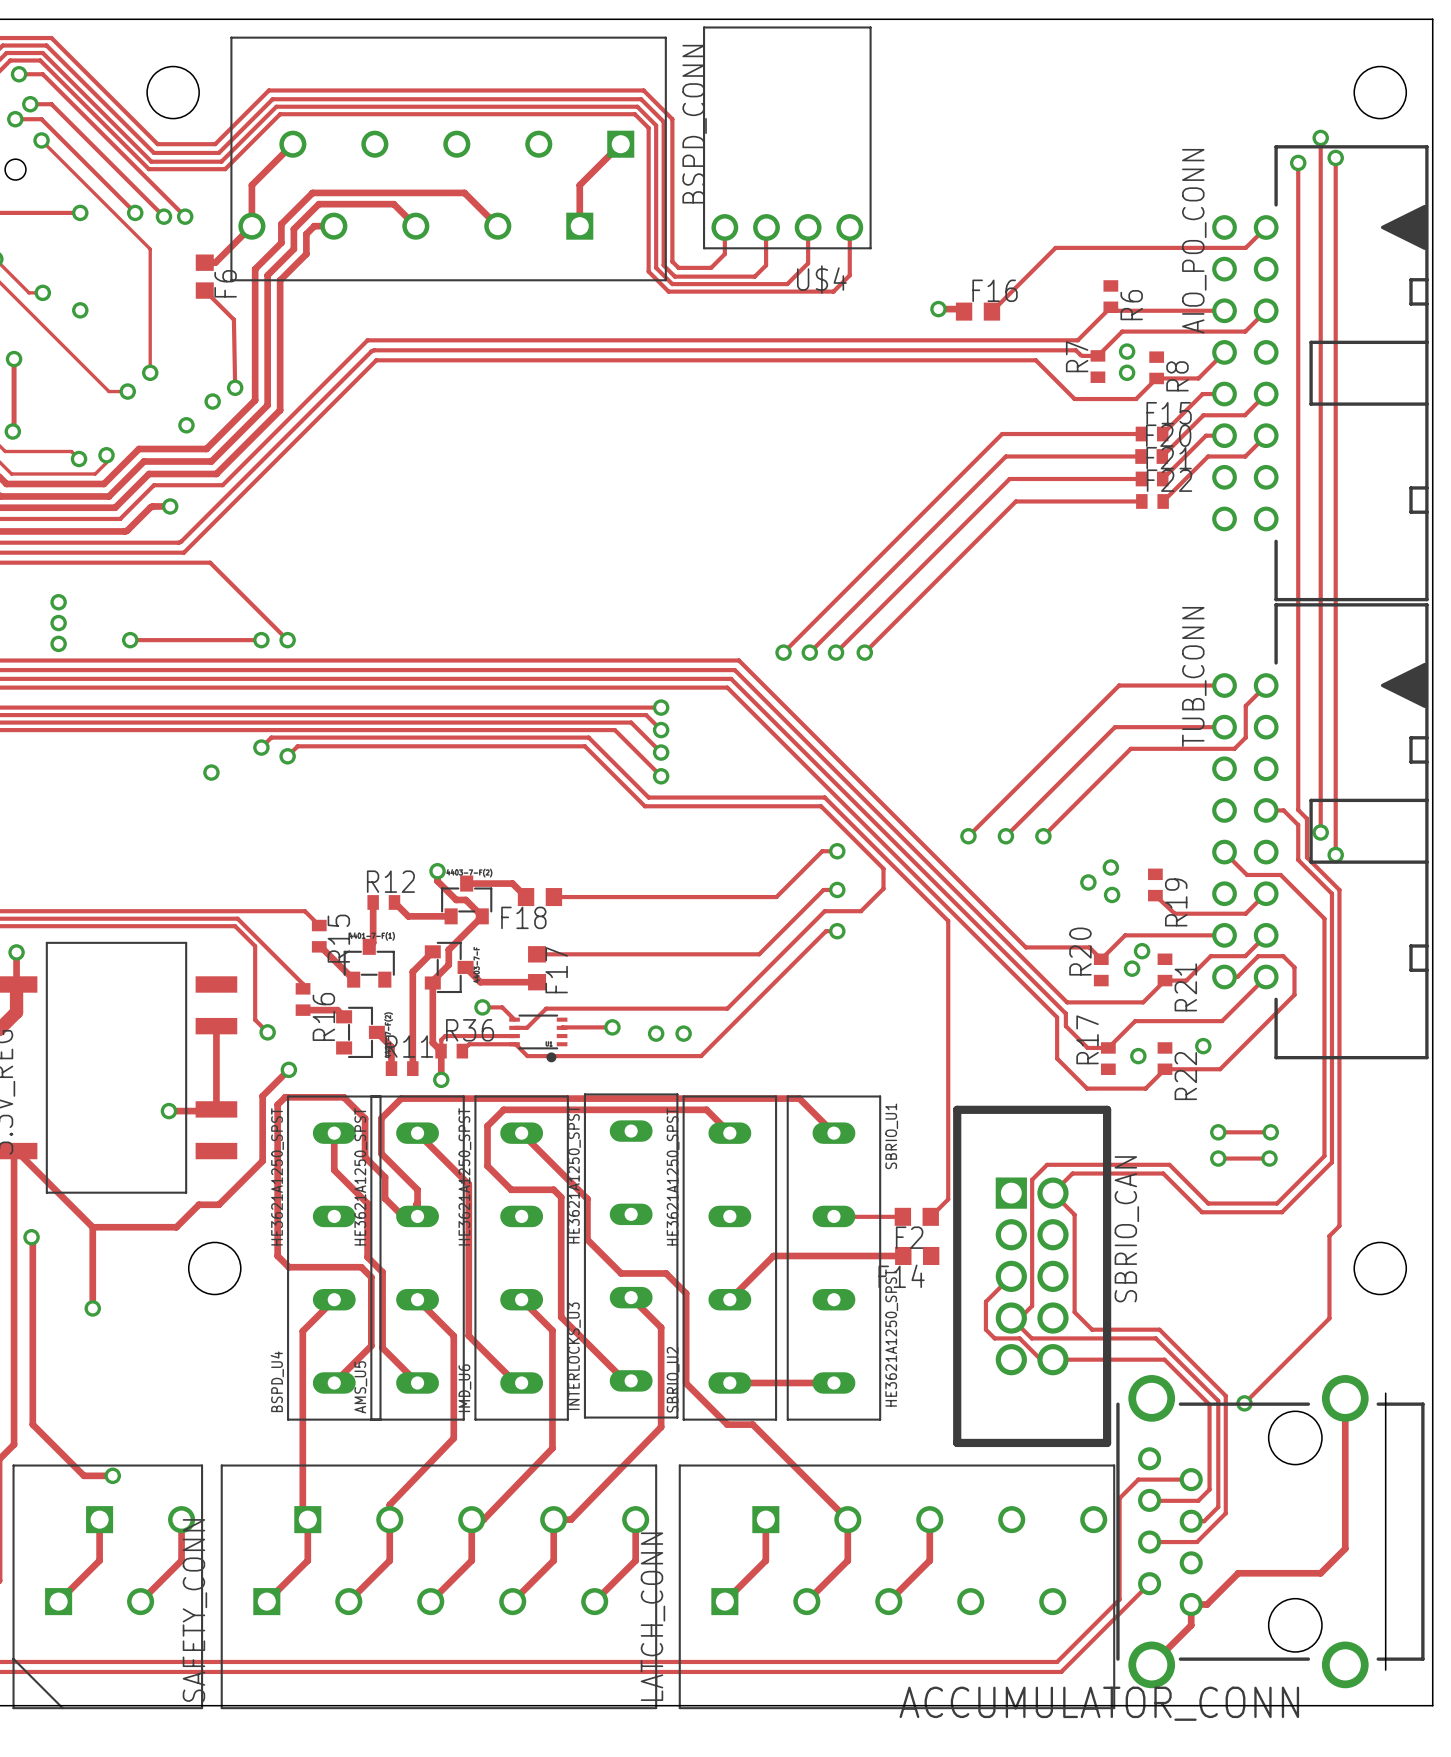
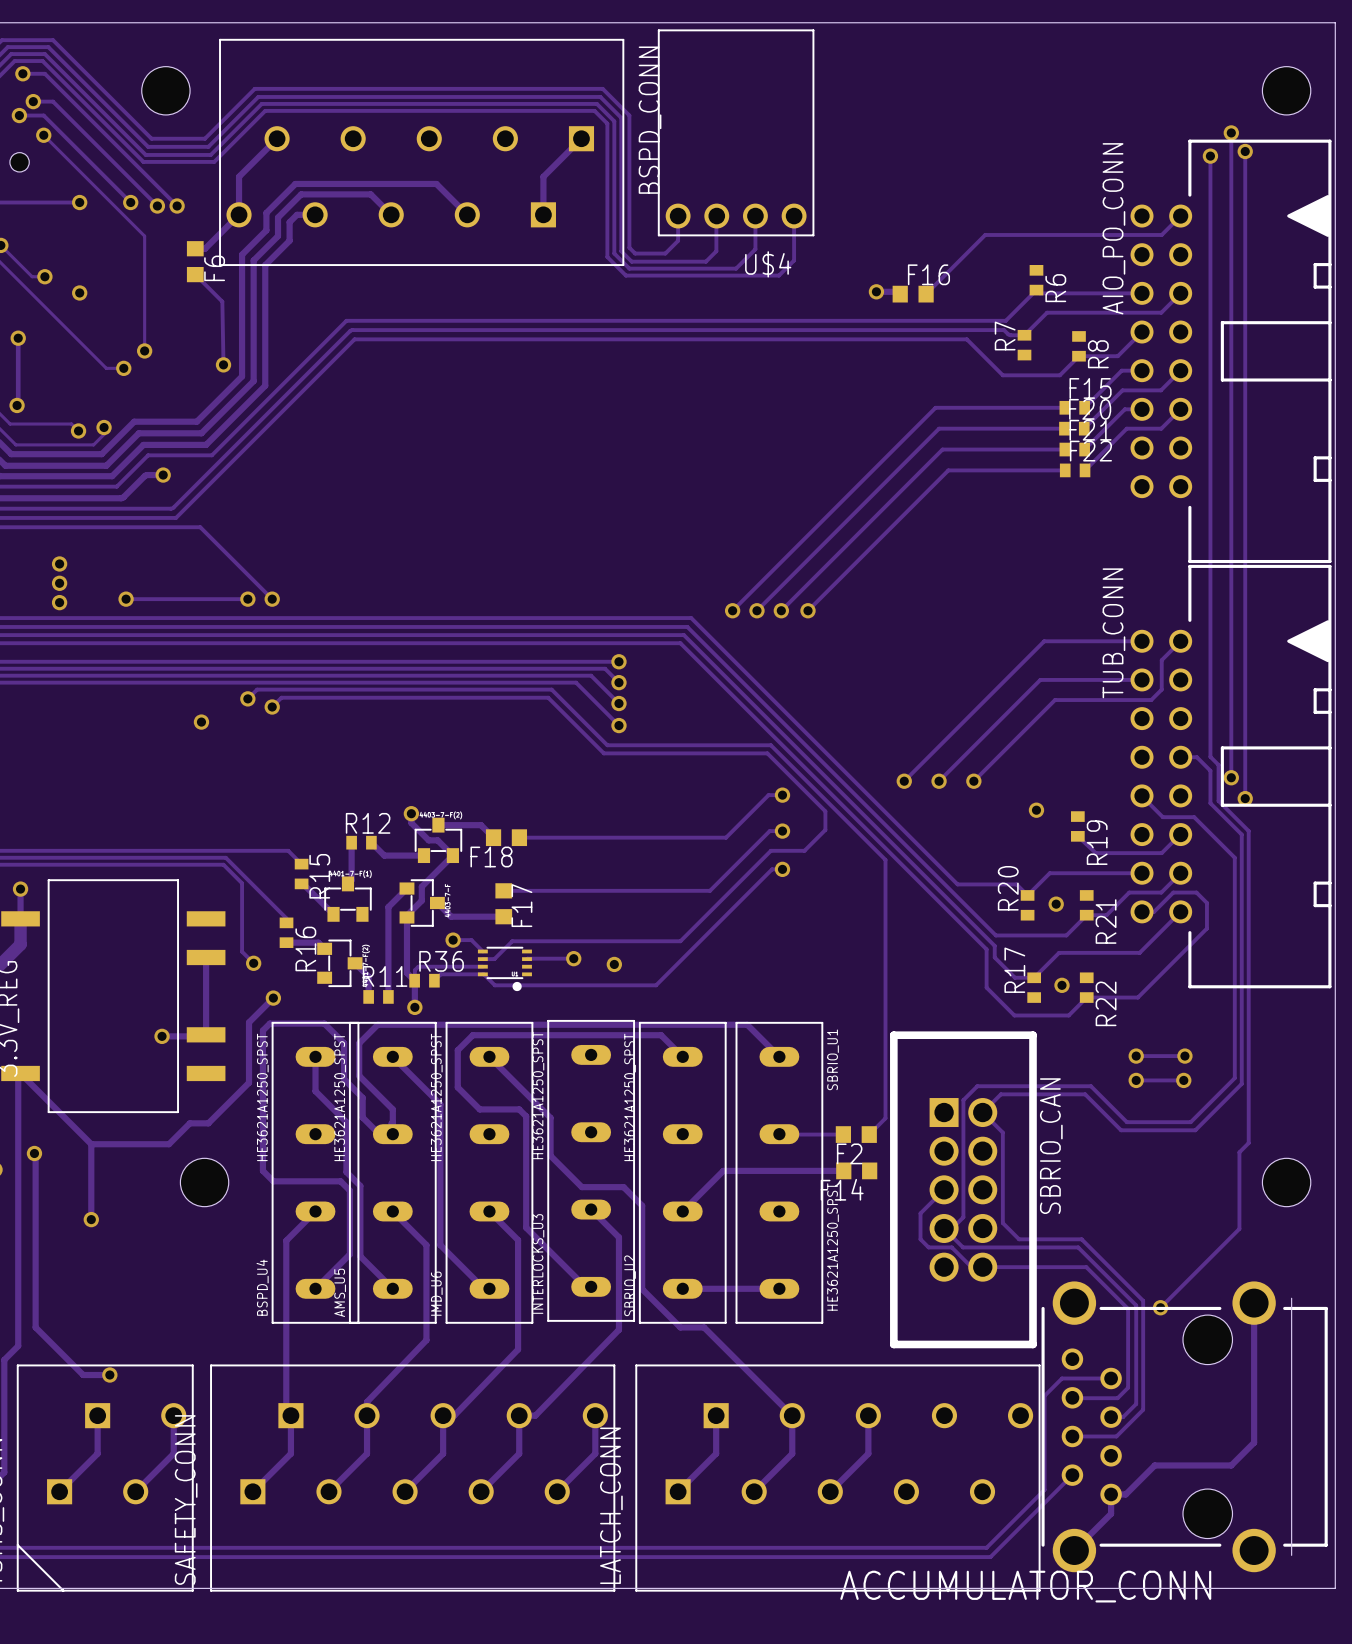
via: (1127, 351) -> none
via: (1127, 372) -> none
via: (212, 401) -> none
via: (186, 425) -> none
via: (1088, 882) -> none
via: (1112, 894) -> none
via: (1142, 951) -> none
via: (683, 1033) -> none
via: (1203, 1046) -> none

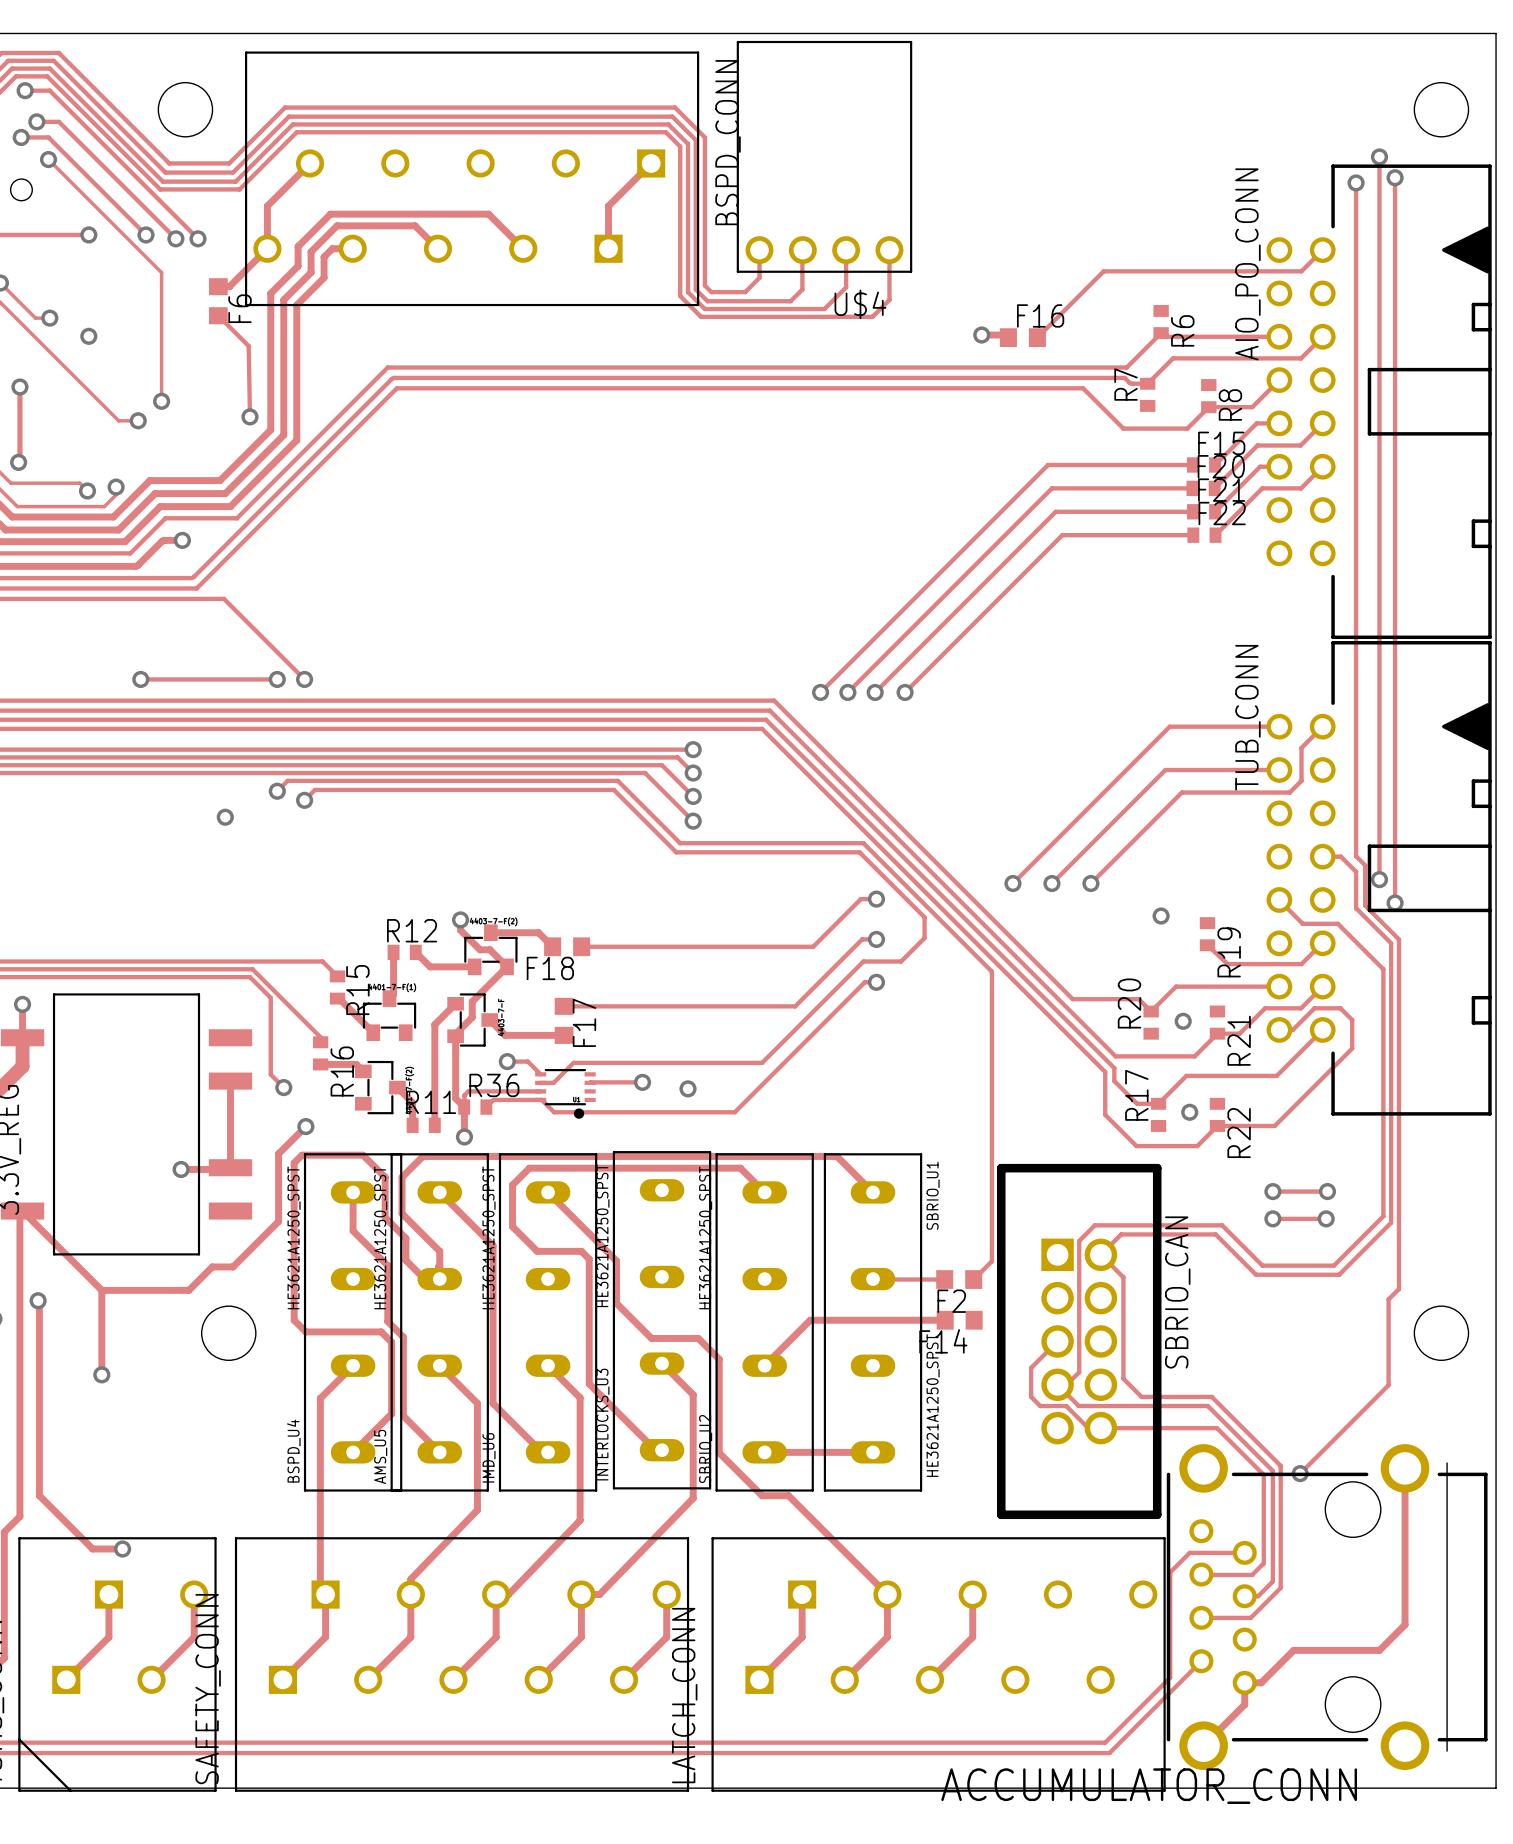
via: (59, 563) -> none
via: (59, 583) -> none
via: (59, 602) -> none

